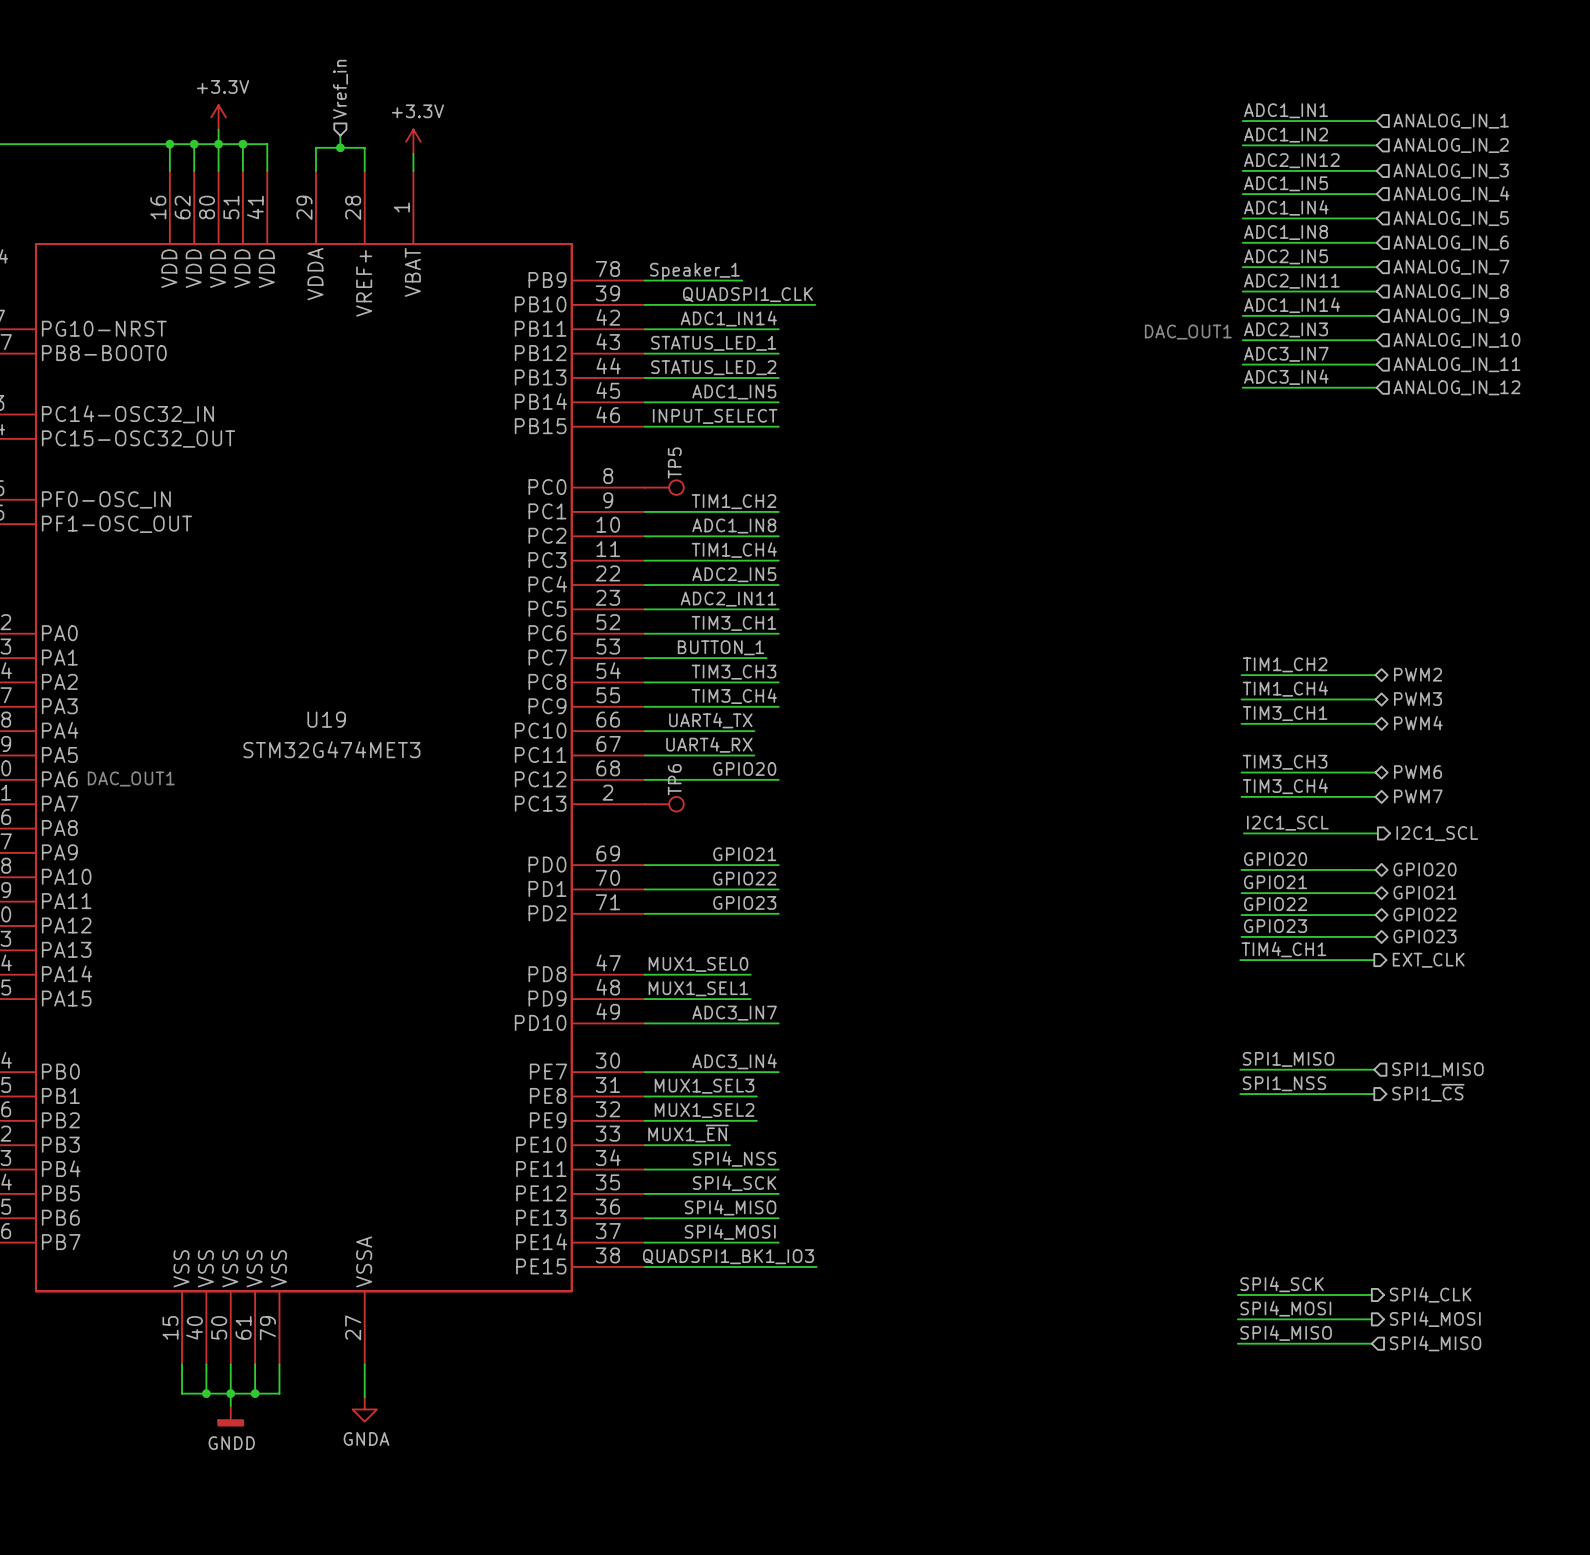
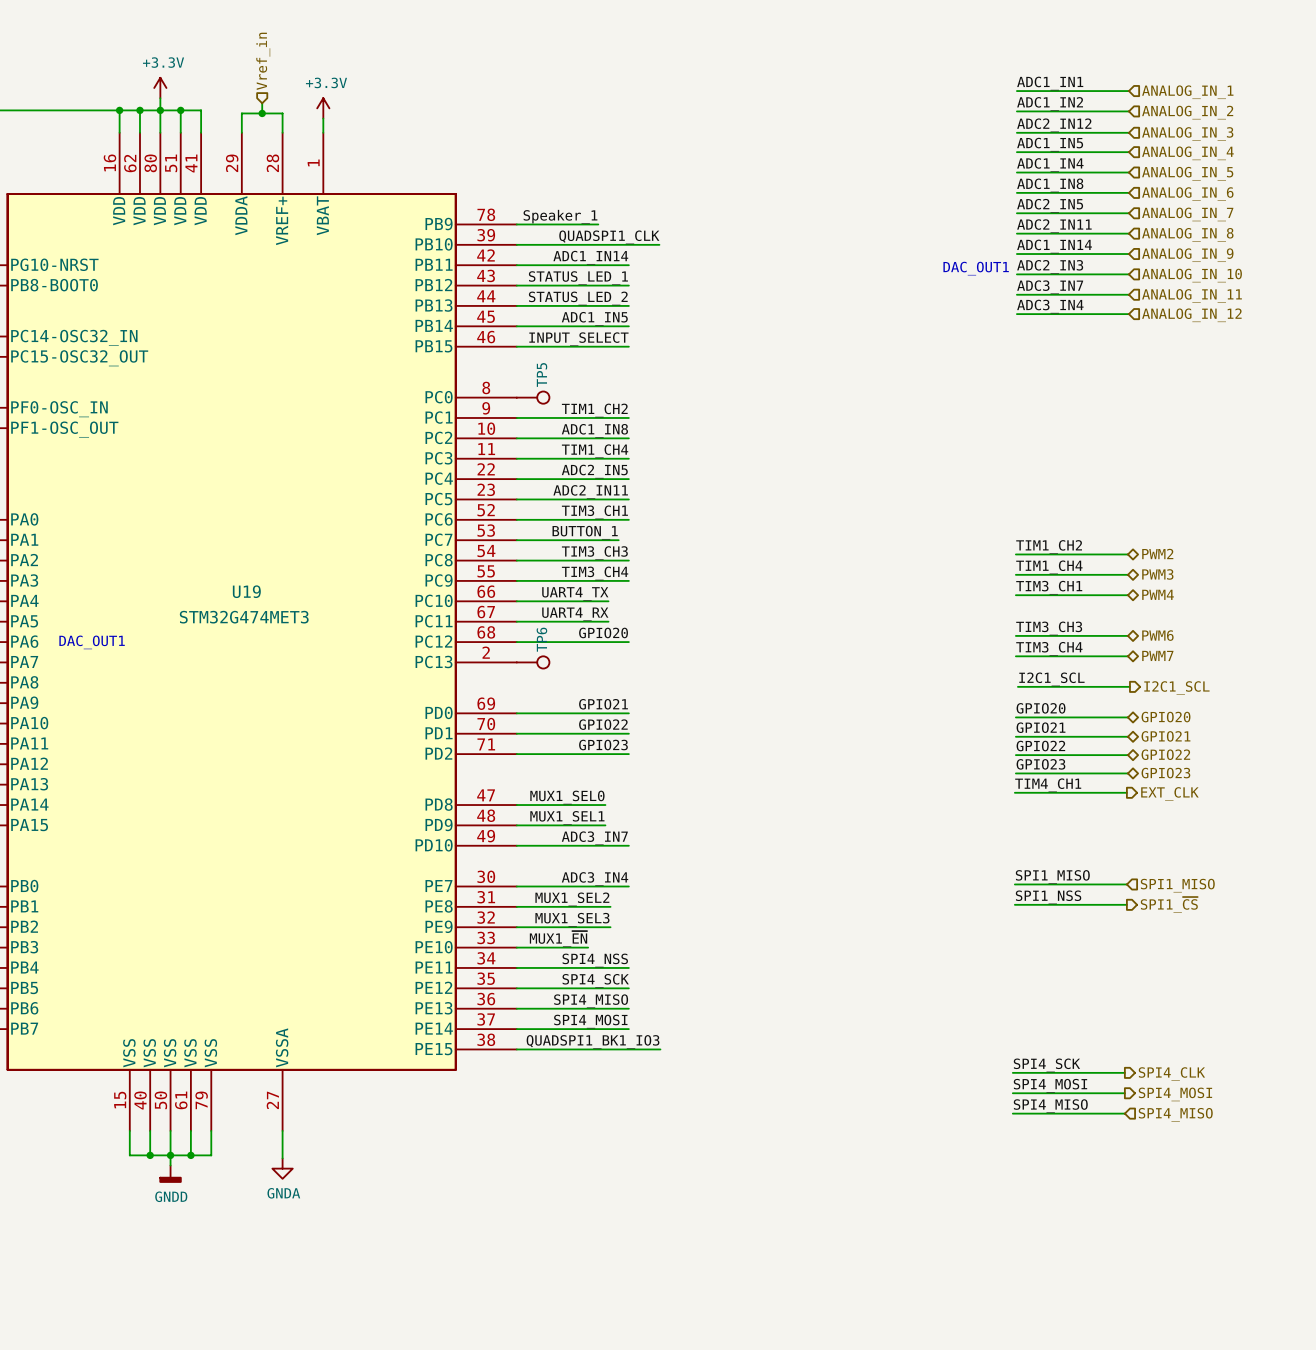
label: MUX1_SEL3 (704, 1086) -> MUX1_SEL2 (572, 899)
label: MUX1_SEL2 (704, 1110) -> MUX1_SEL3 (572, 919)

